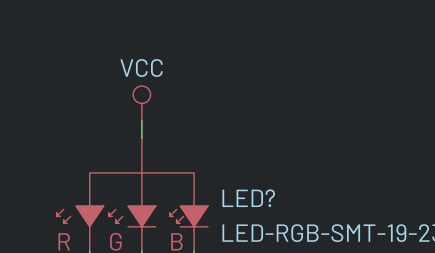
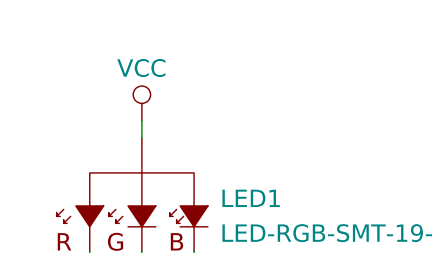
LED? name: LED? (248, 198) -> LED1 (251, 198)

